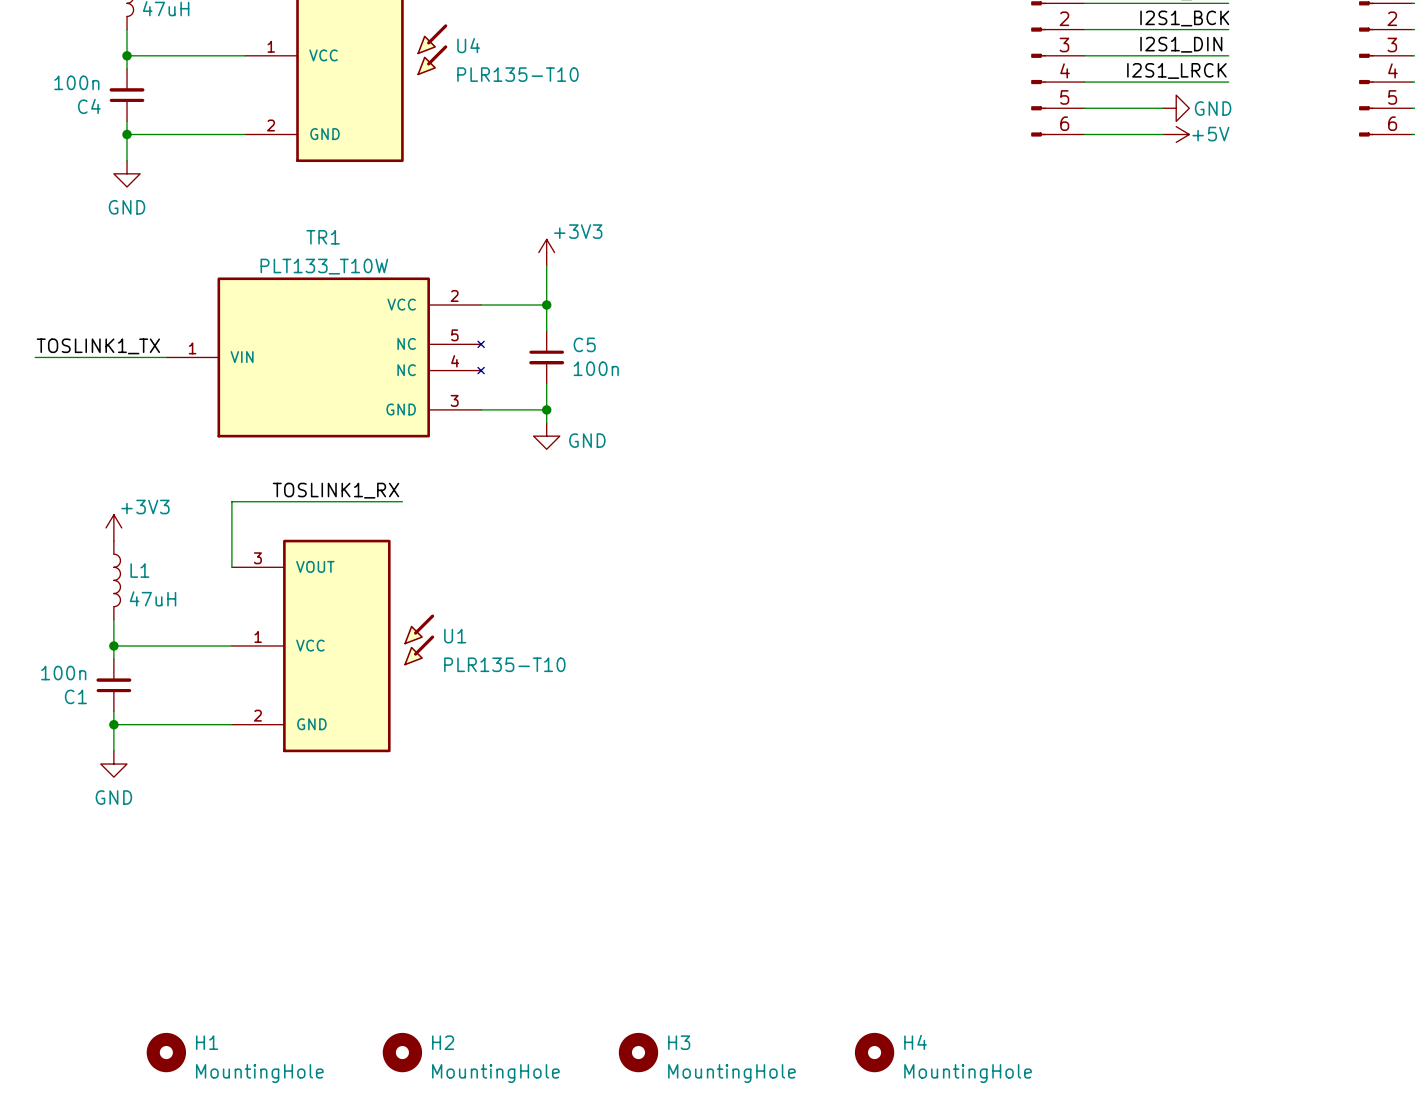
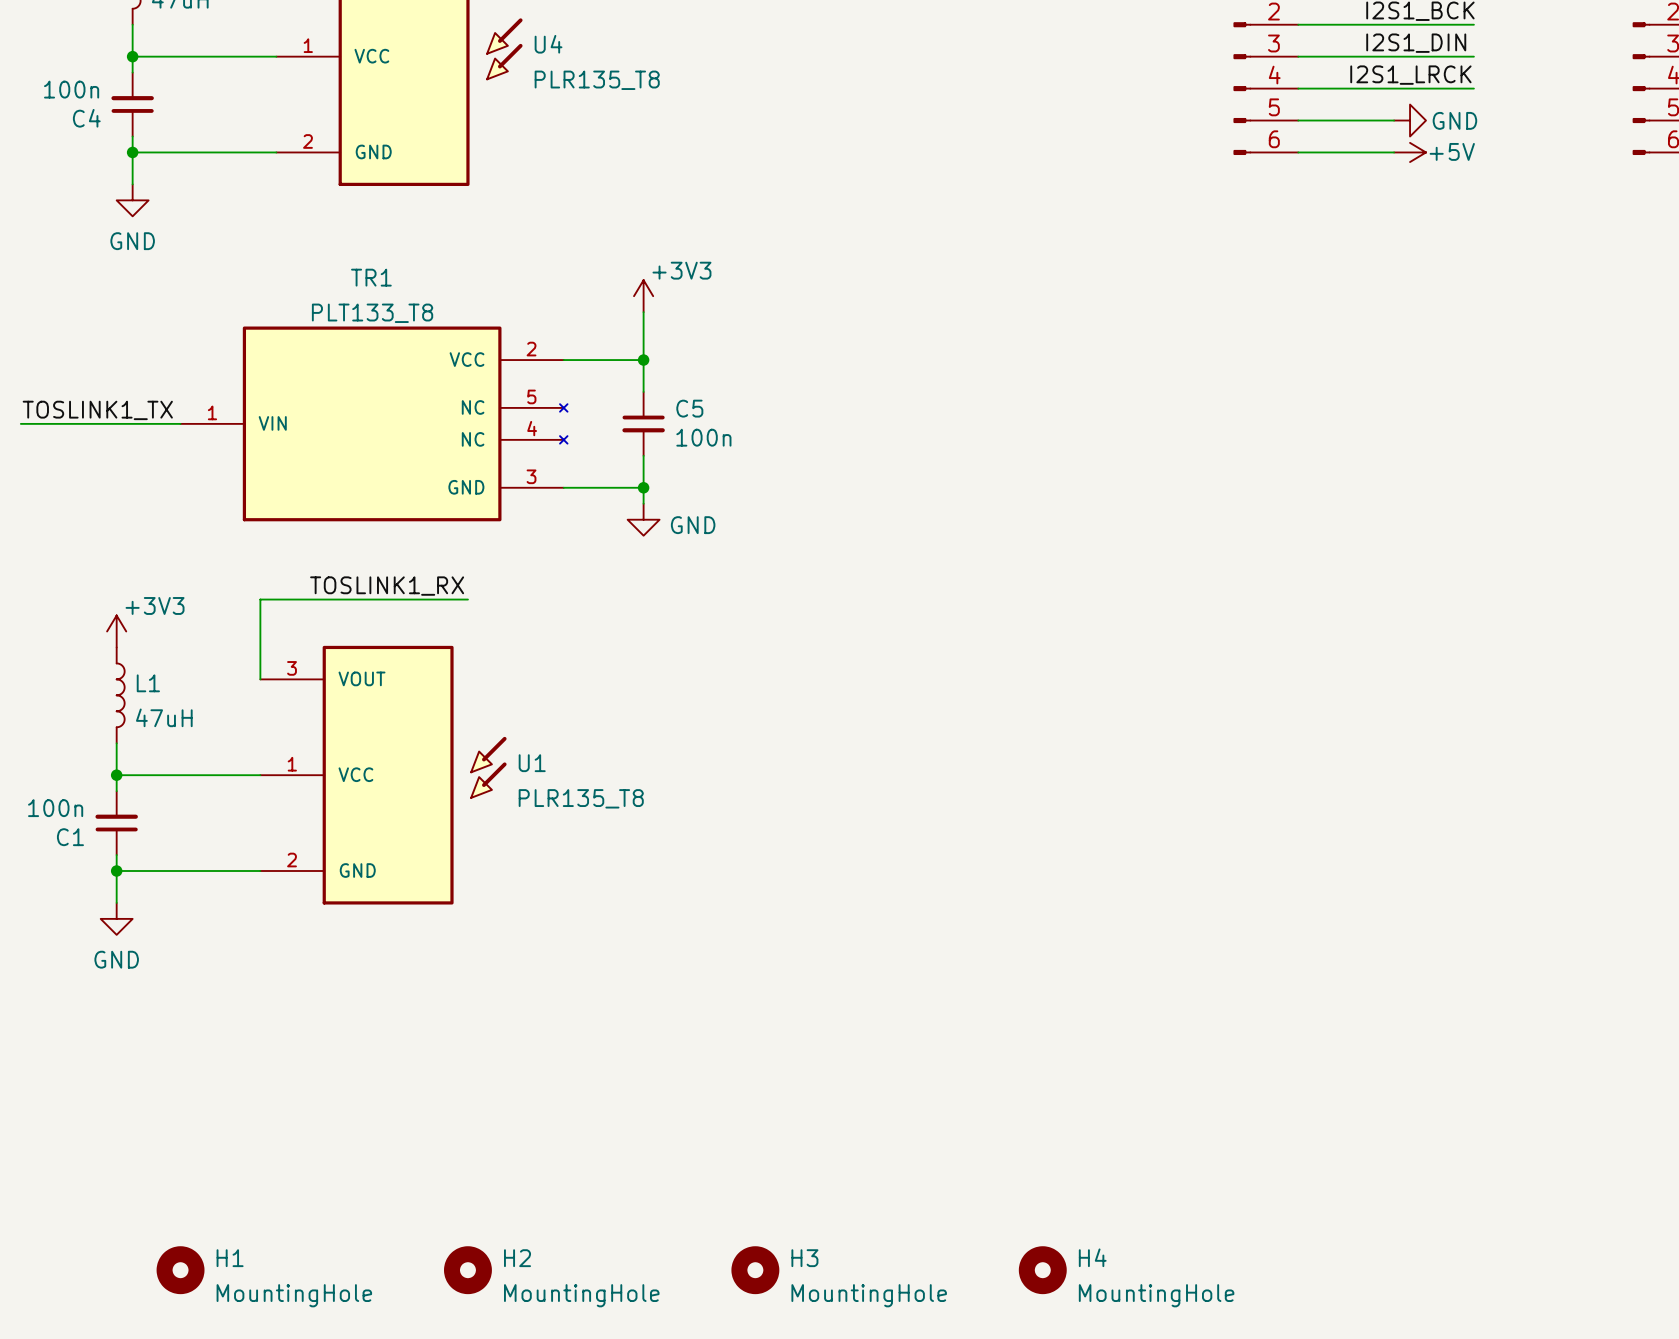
U4 value: PLR135-T10 (517, 74) -> PLR135_T8 (597, 80)
TR1 value: PLT133_T10W (324, 266) -> PLT133_T8 (372, 313)
U1 value: PLR135-T10 (504, 664) -> PLR135_T8 (581, 798)

